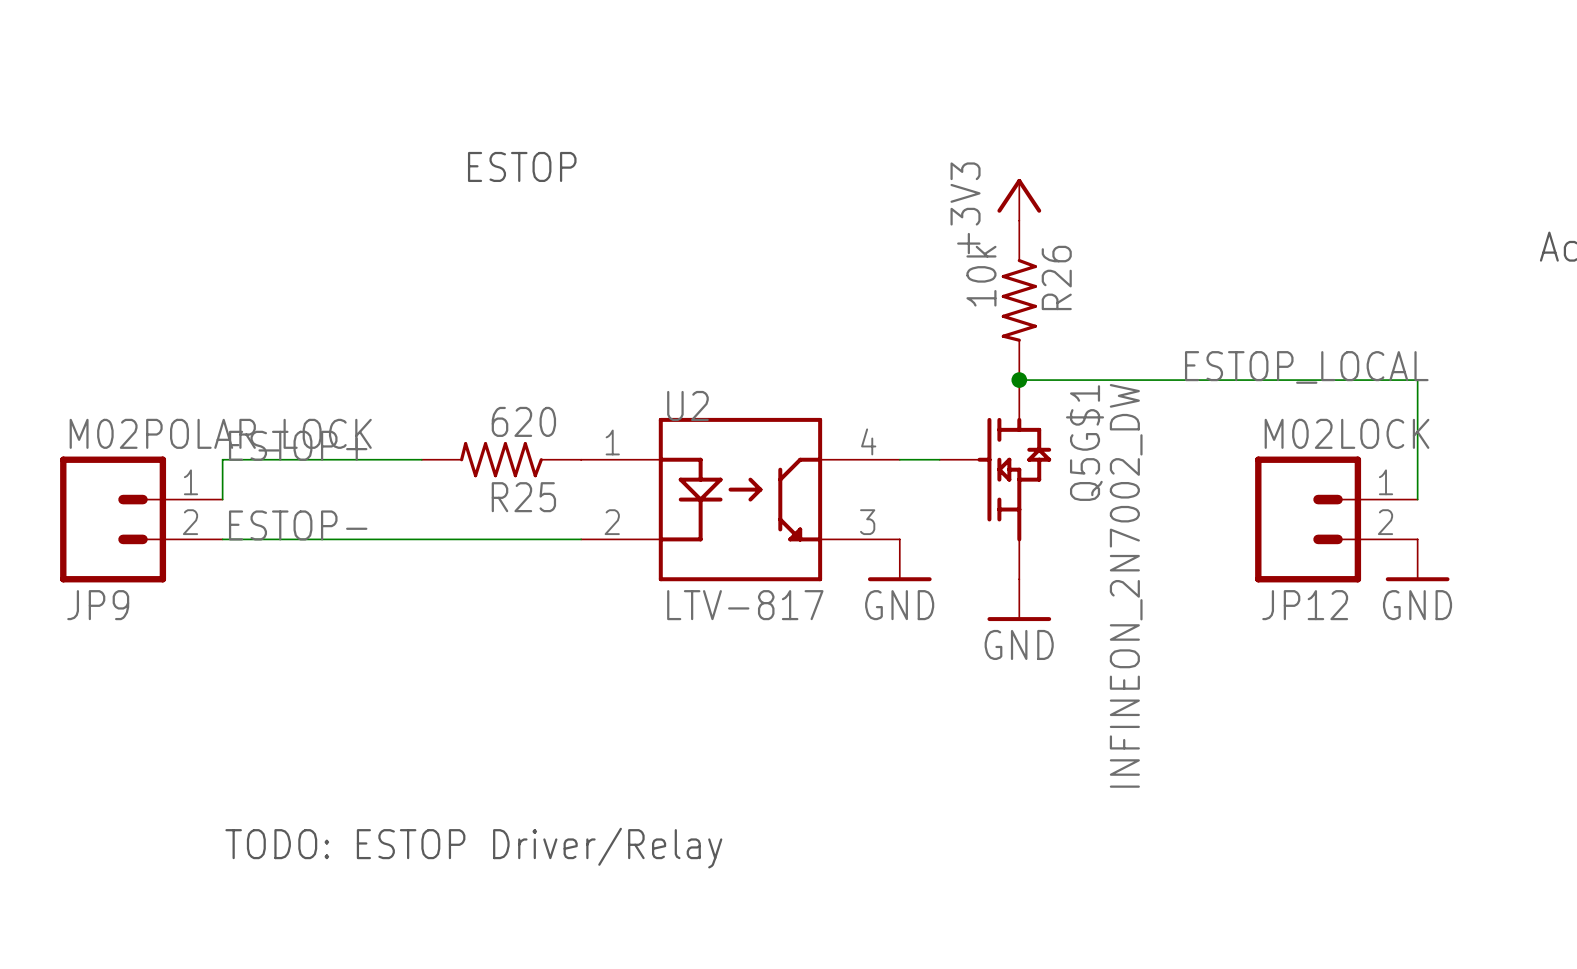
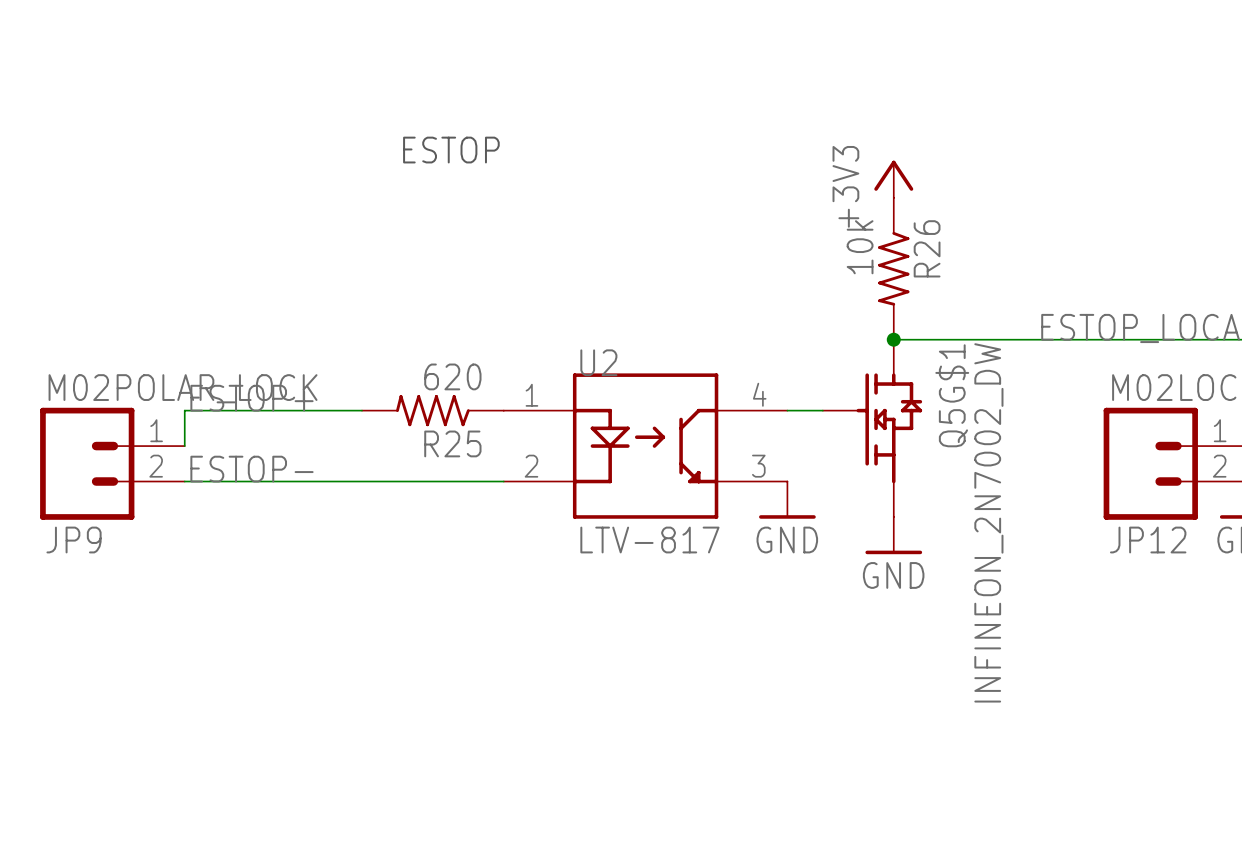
text: TODO: ESTOP Driver/Relay (473, 848) -> none

